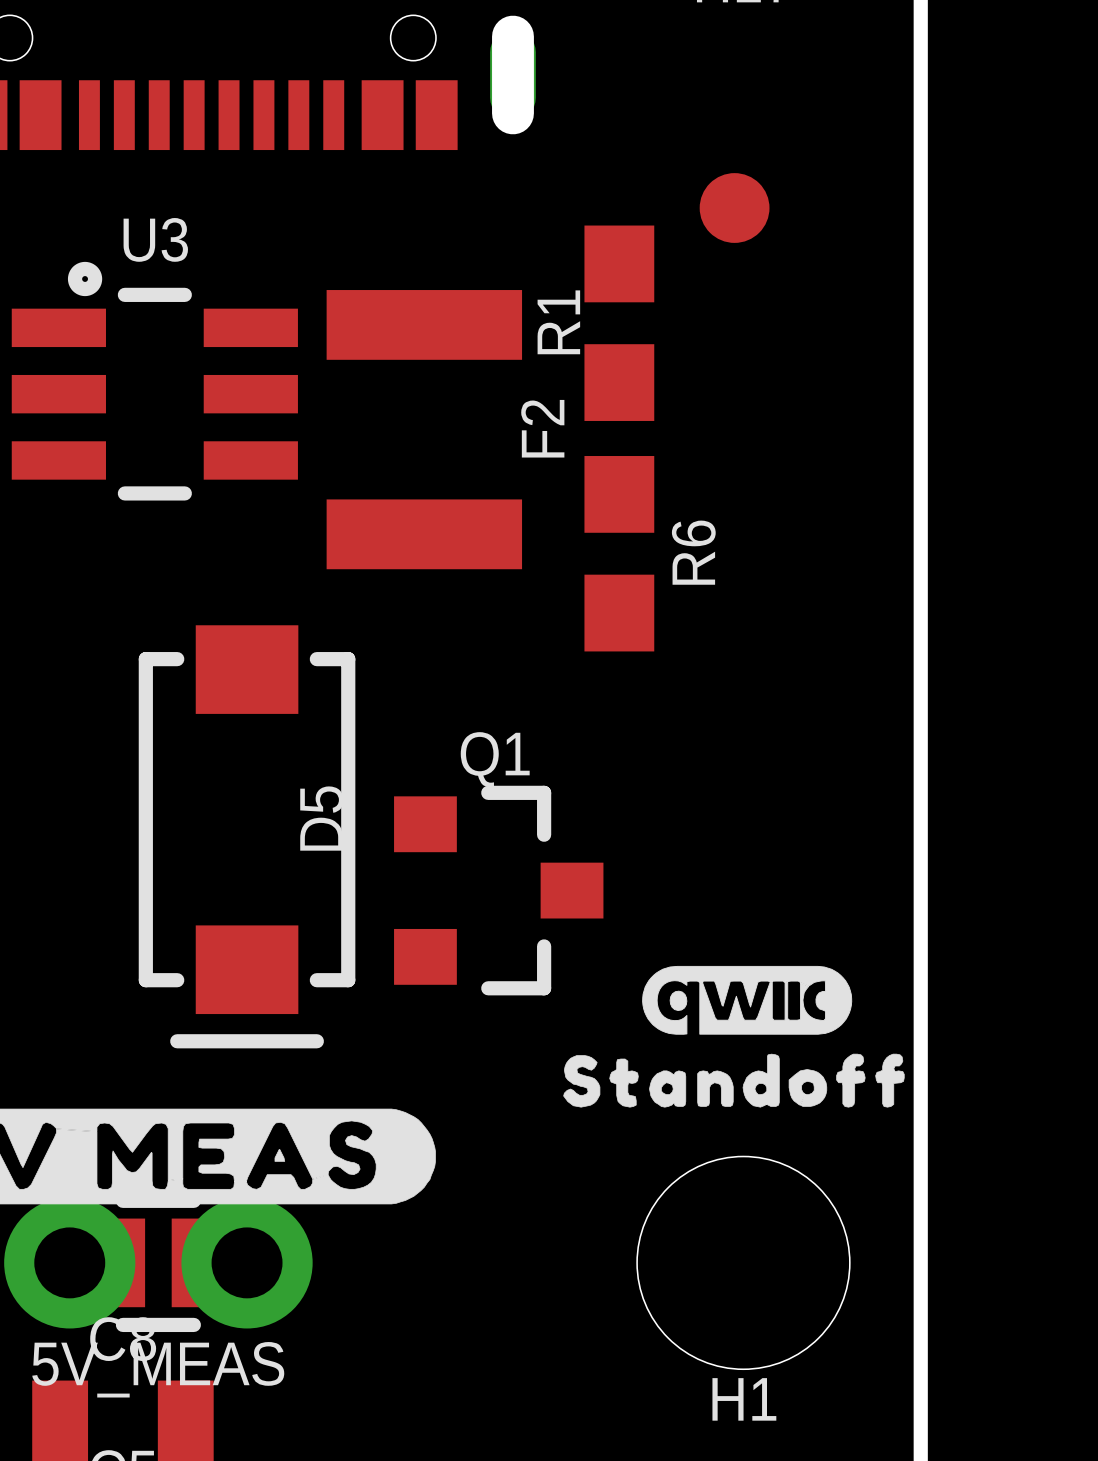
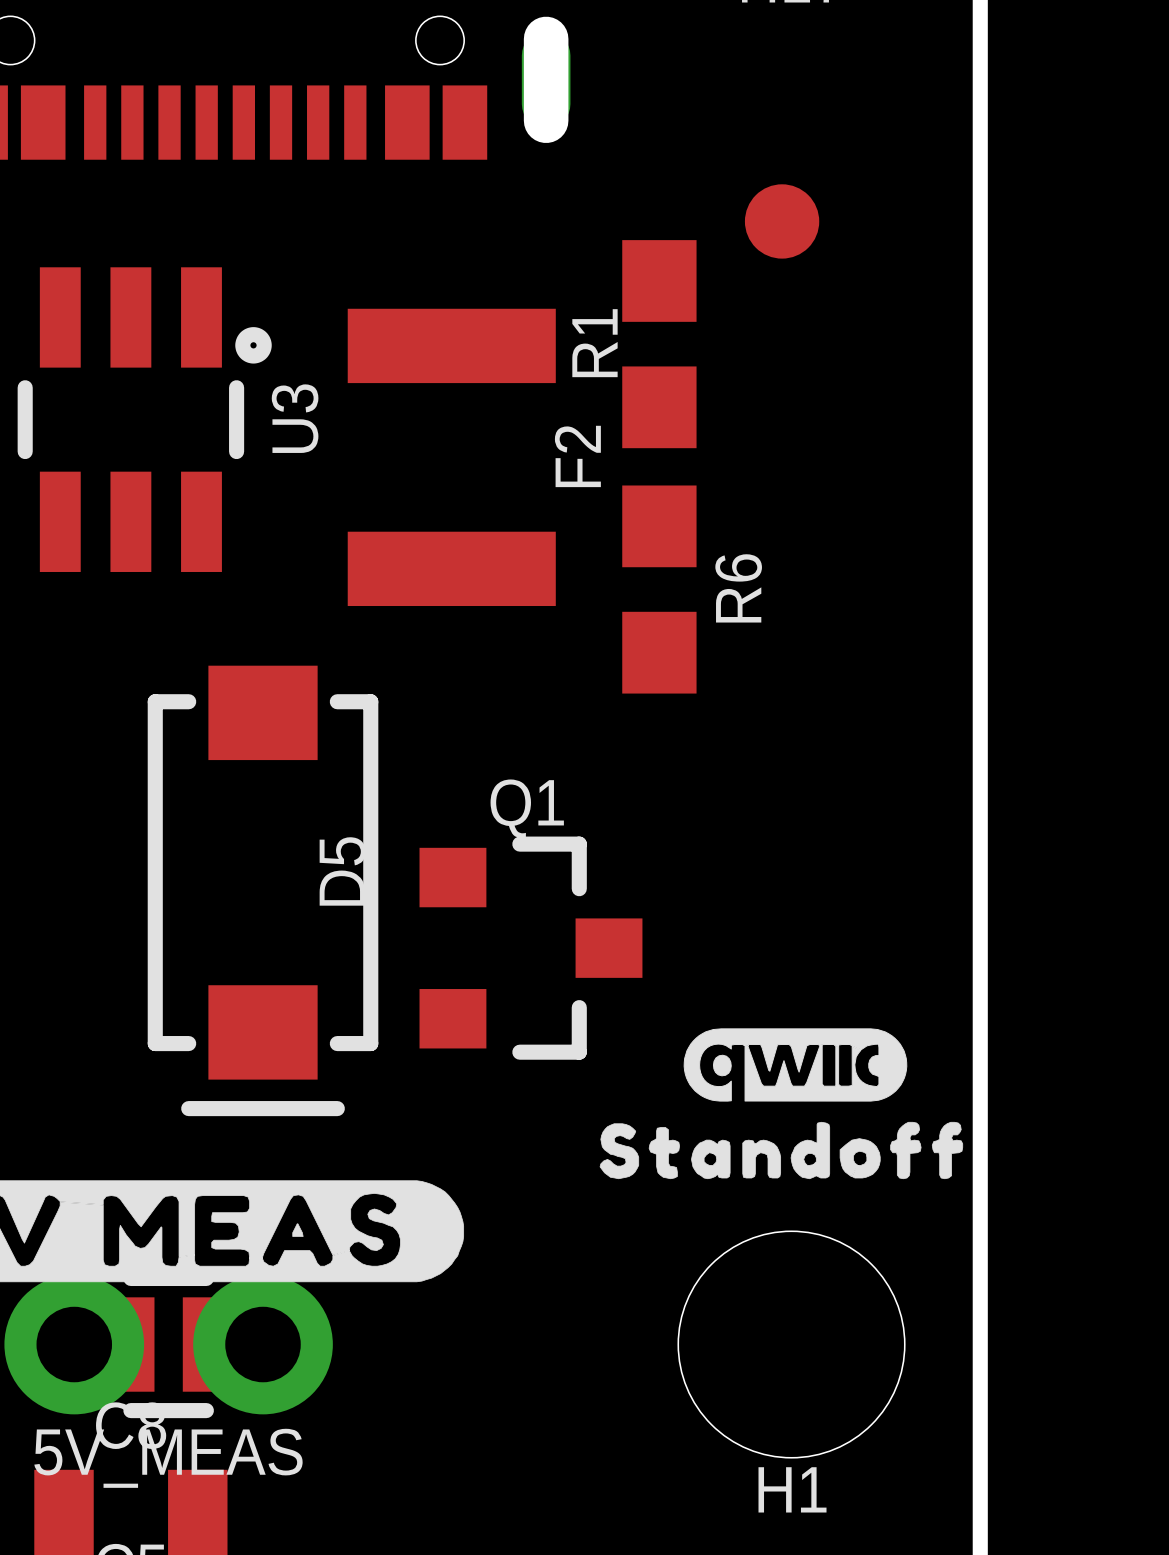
U3 rotation: 0° (154, 381) -> 90° clockwise (144, 419)

